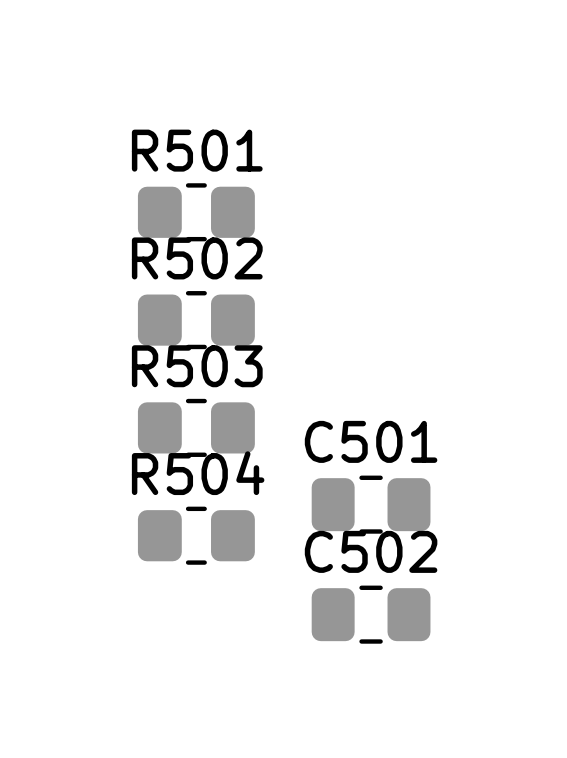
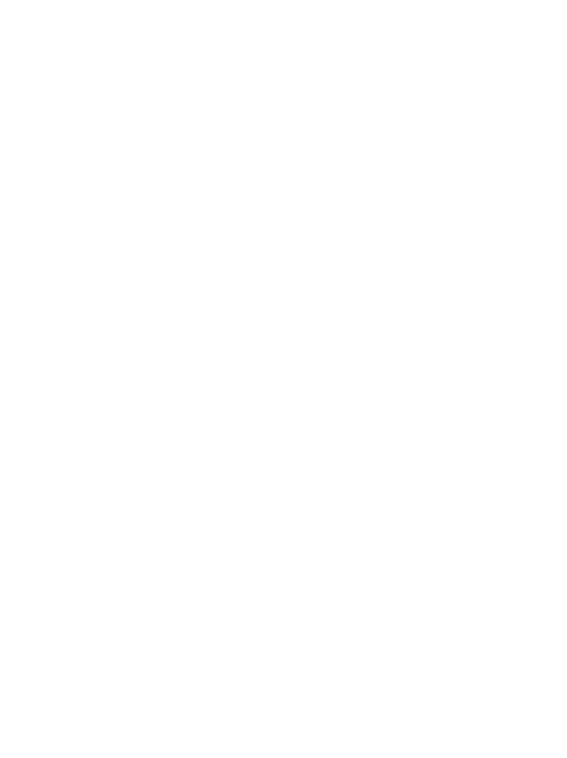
R501: (196, 212) -> none
R502: (196, 320) -> none
R503: (196, 427) -> none
C501: (371, 504) -> none
R504: (196, 535) -> none
C502: (371, 614) -> none

